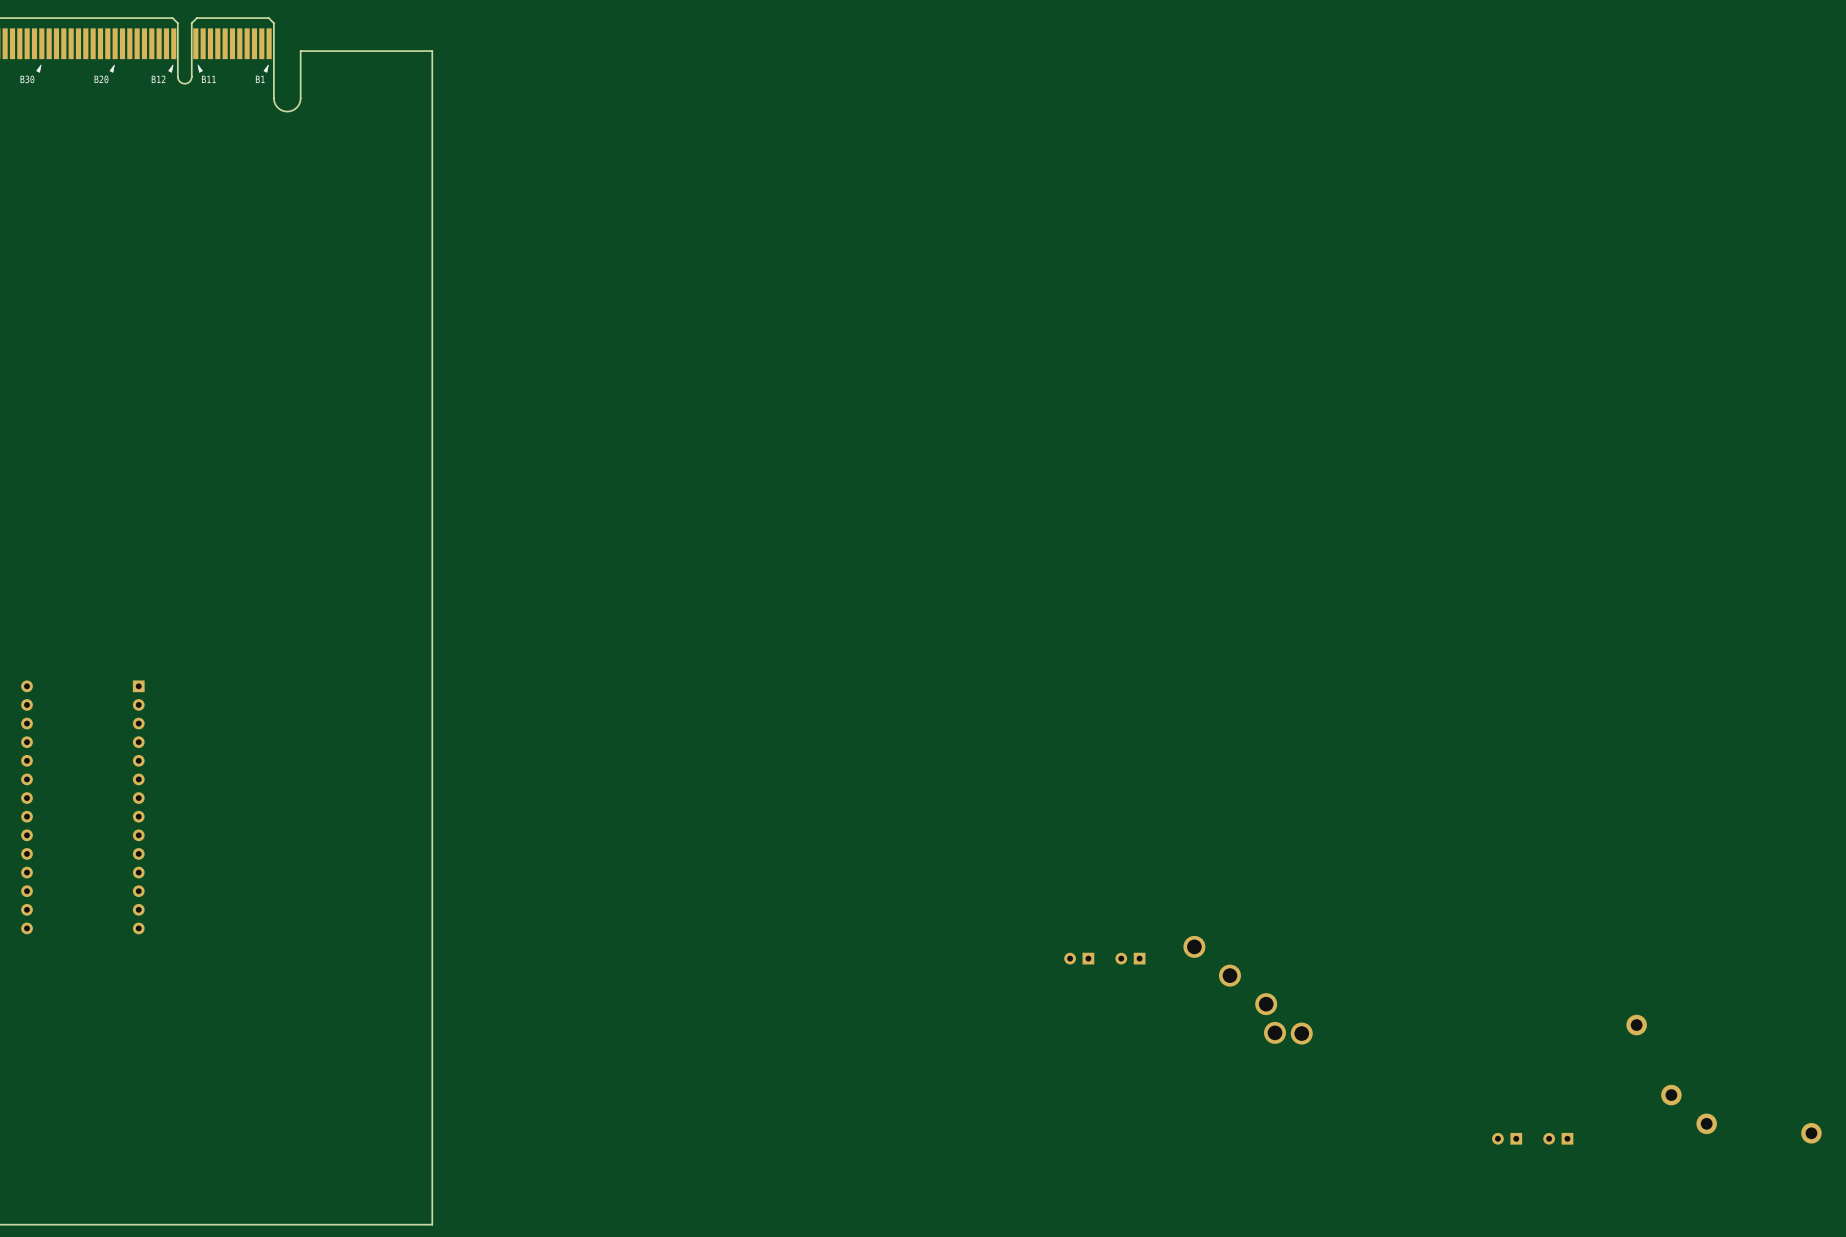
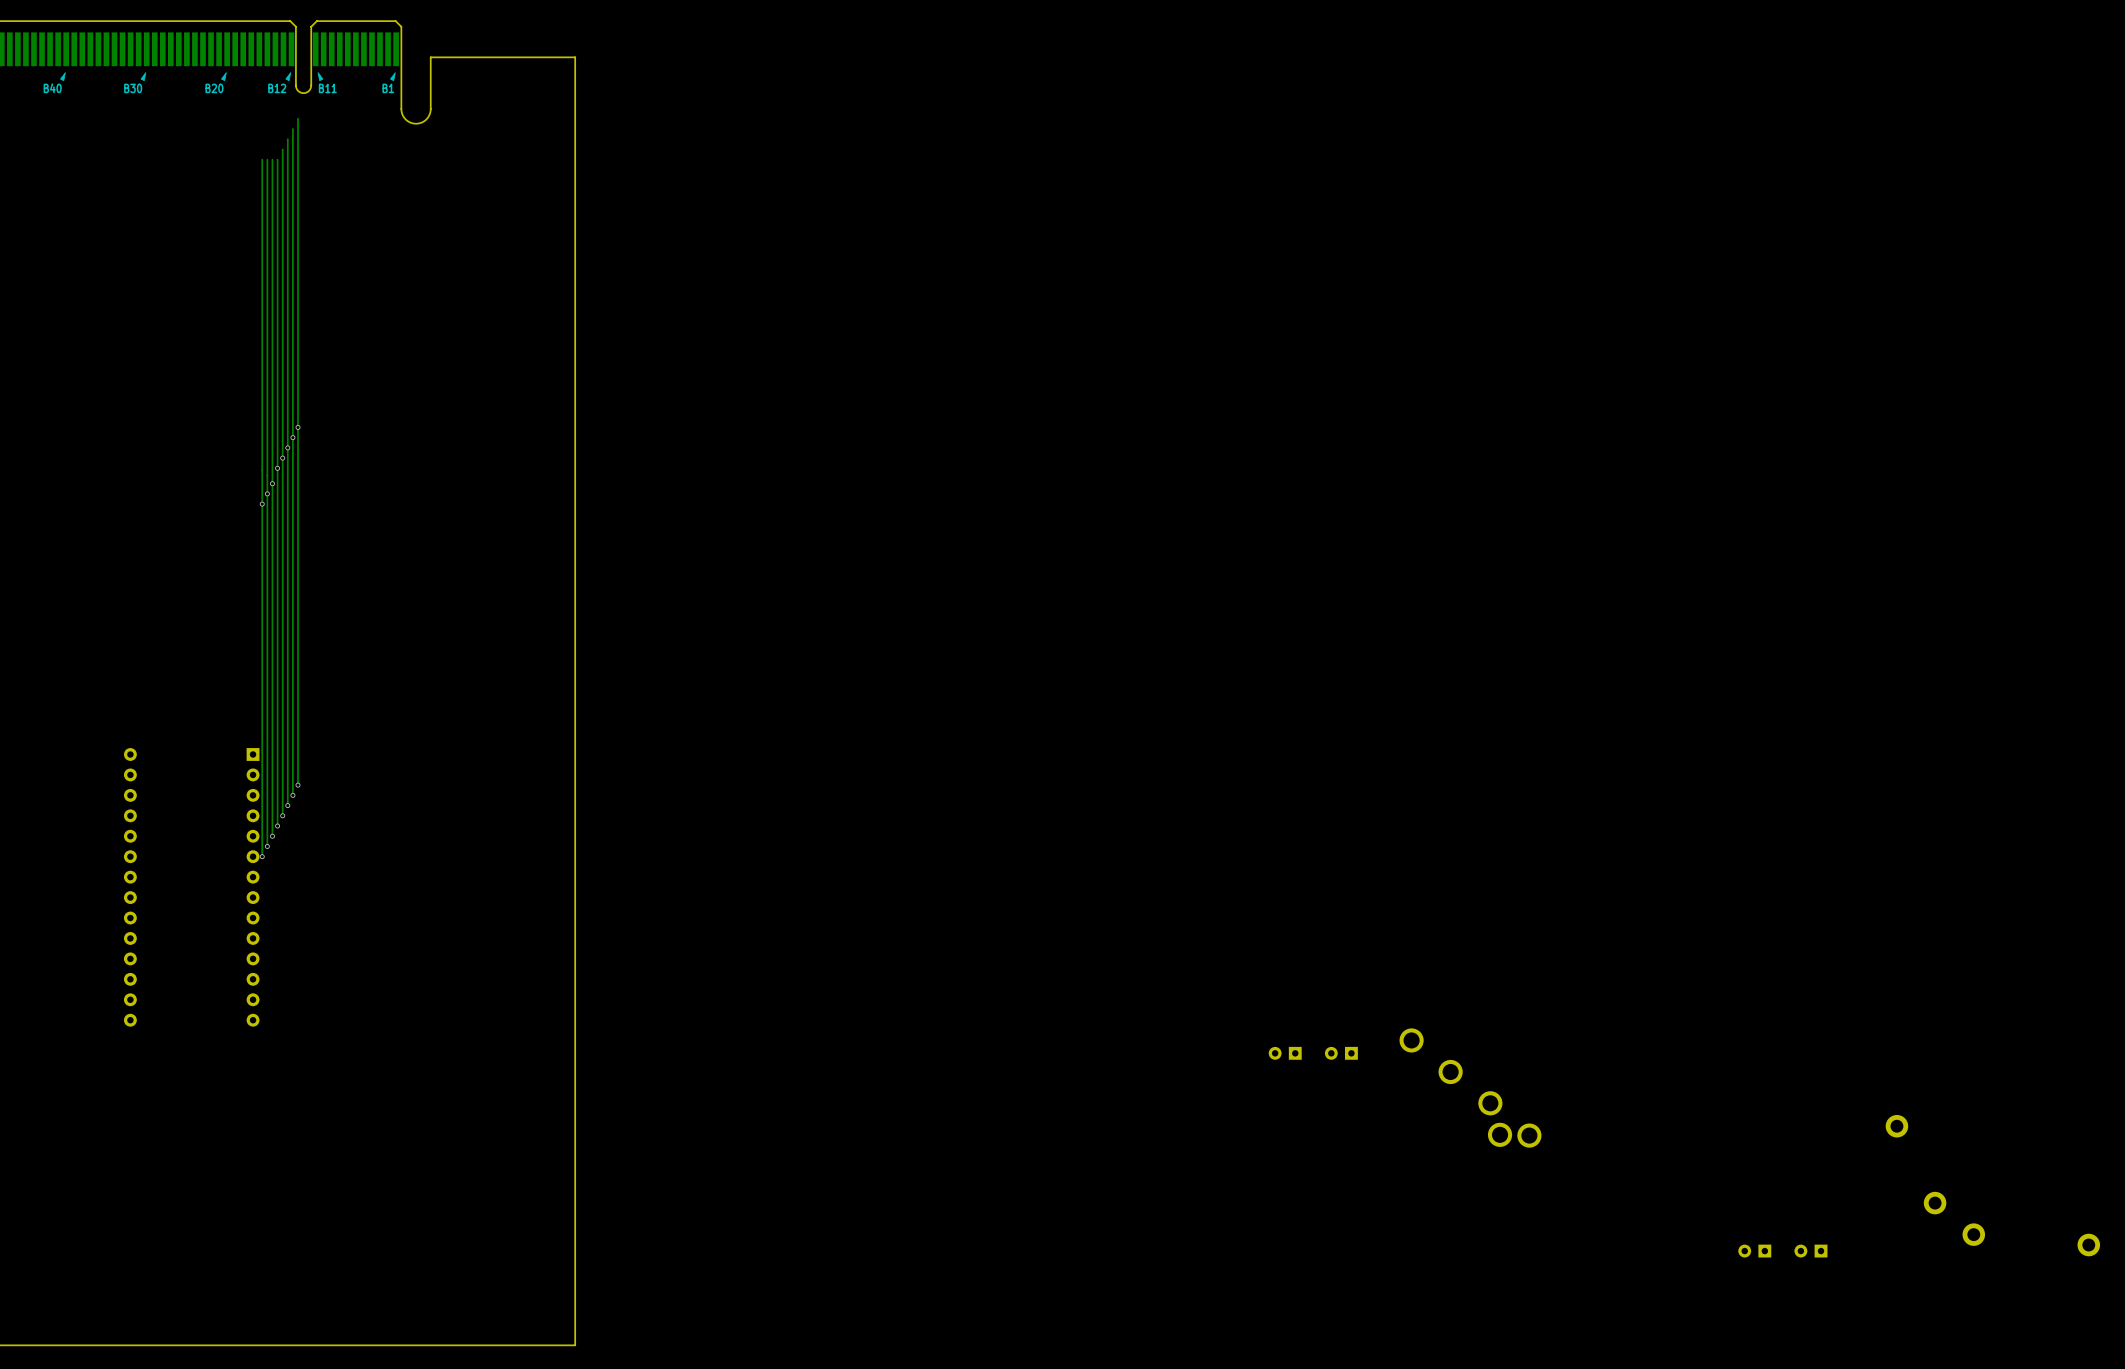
track: none -> (298, 118) (298, 785)
track: none -> (292, 129) (292, 795)
track: none -> (287, 139) (287, 805)
track: none -> (282, 149) (282, 815)
track: none -> (262, 159) (262, 856)
track: none -> (267, 159) (267, 846)
track: none -> (272, 159) (272, 836)
track: none -> (277, 159) (277, 826)
via: none -> (298, 427)
via: none -> (292, 437)
via: none -> (287, 447)
via: none -> (282, 458)
via: none -> (277, 468)
via: none -> (272, 483)
via: none -> (267, 493)
via: none -> (262, 504)
via: none -> (298, 785)
via: none -> (292, 795)
via: none -> (287, 805)
via: none -> (282, 815)
via: none -> (277, 826)
via: none -> (272, 836)
via: none -> (267, 846)
via: none -> (262, 856)

